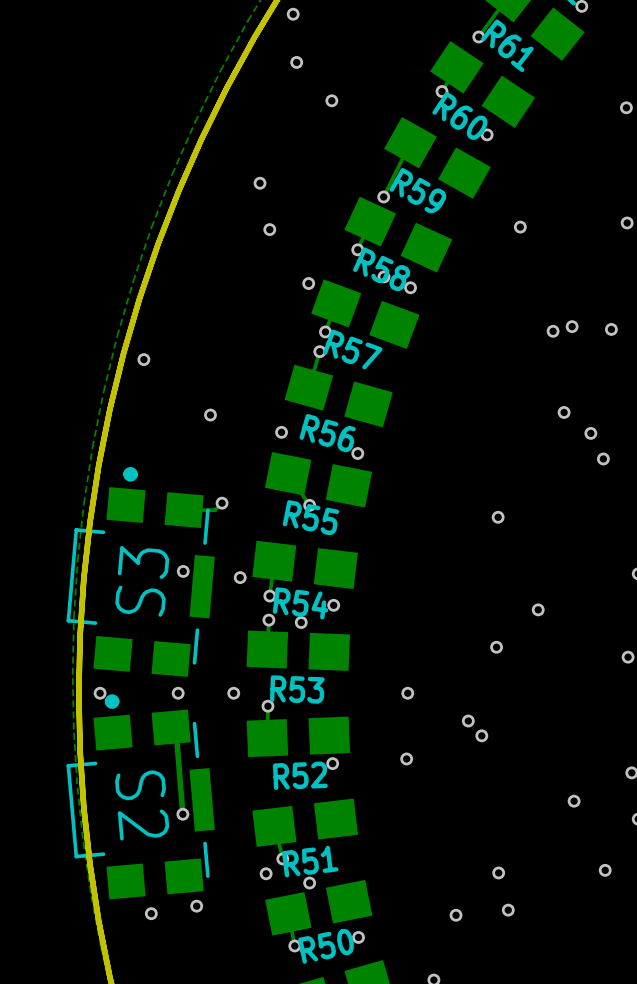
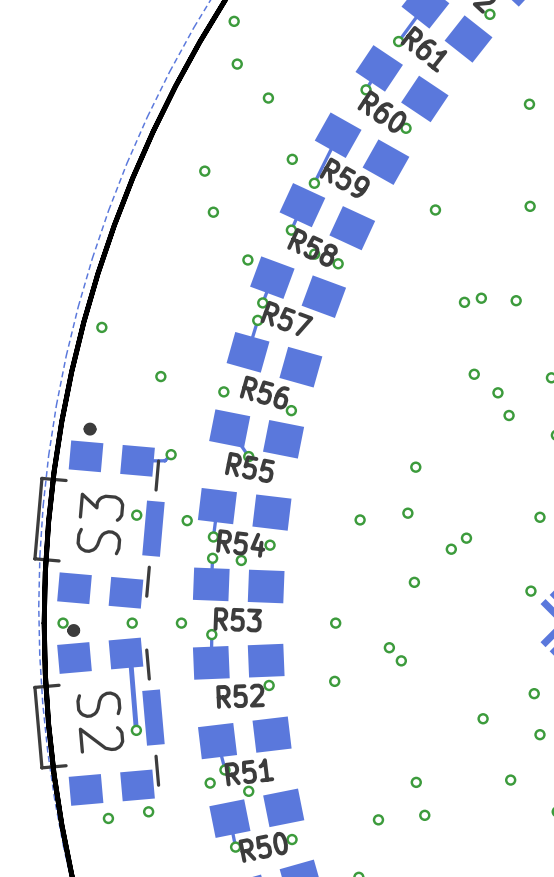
via: none -> (292, 159)
via: none -> (407, 513)
via: none -> (360, 519)
via: none -> (466, 538)

